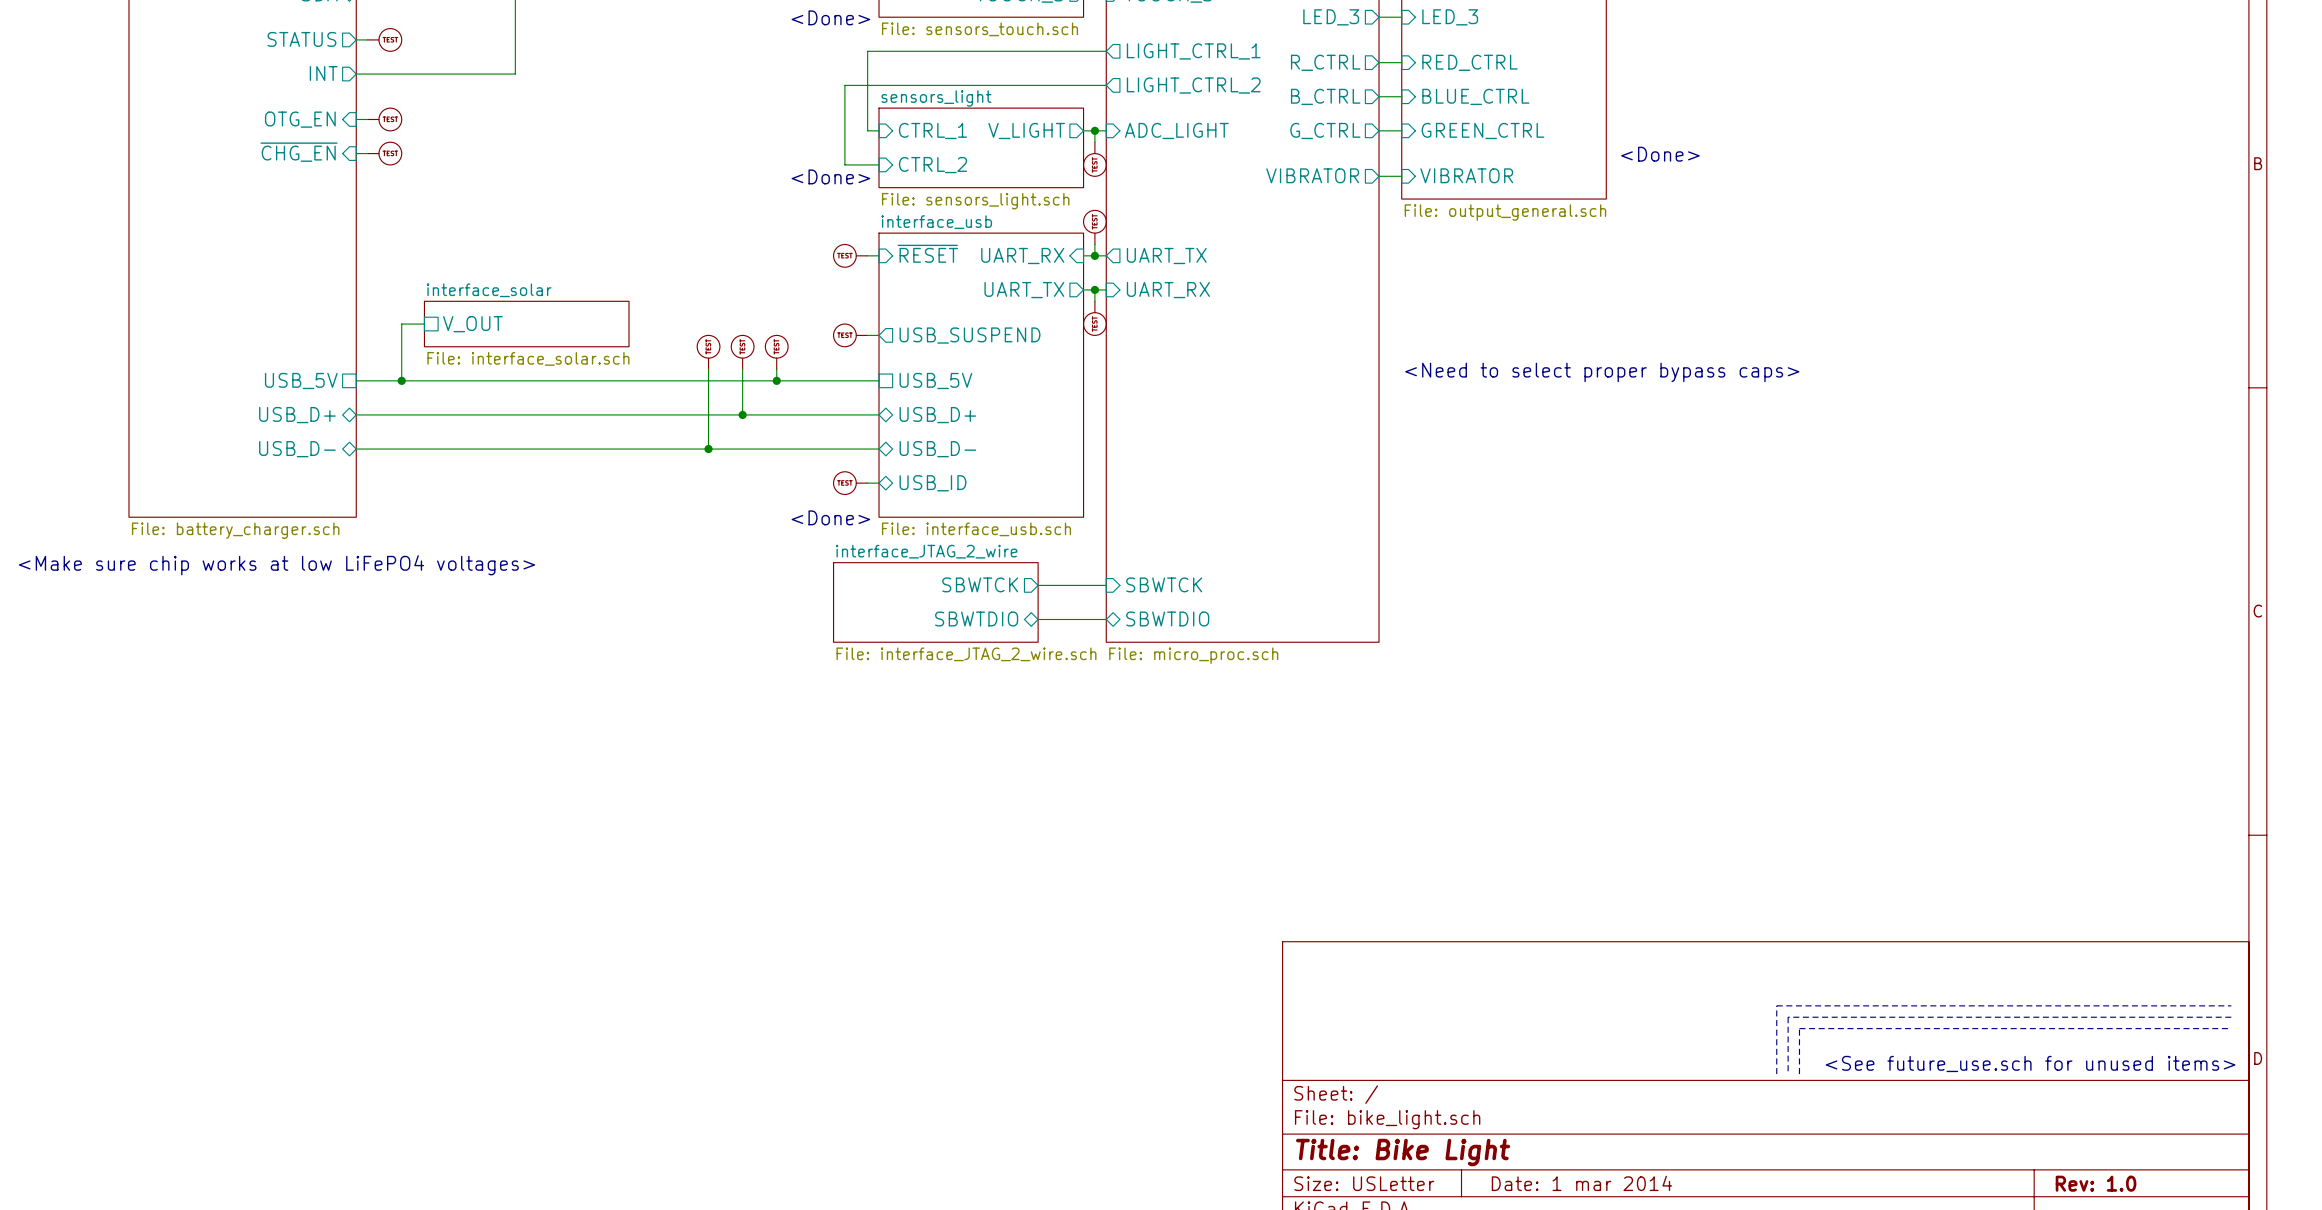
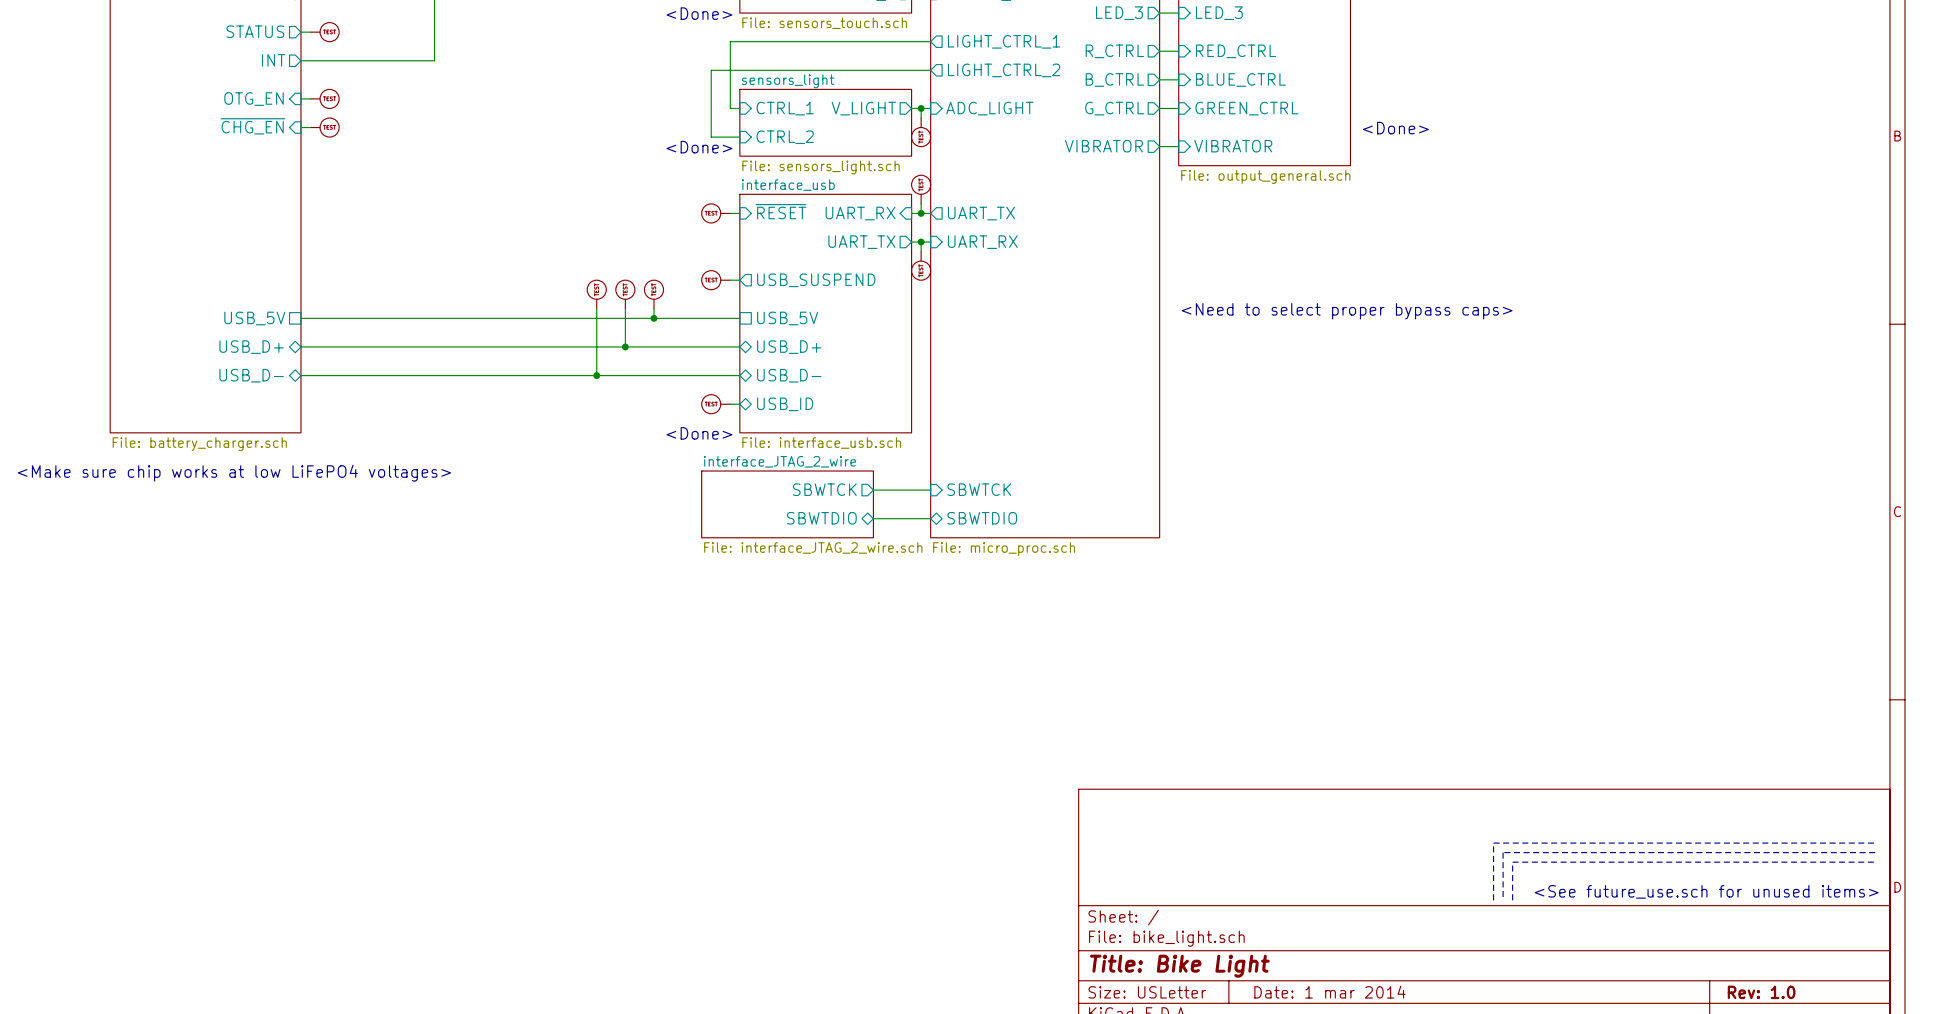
wire: (424, 324) (401, 324) (401, 380) -> none
sheet pin: V_OUT (472, 324) -> none
sheet interface_solar: File: interface_solar.sch (526, 324) -> none
junction: (401, 380) -> none

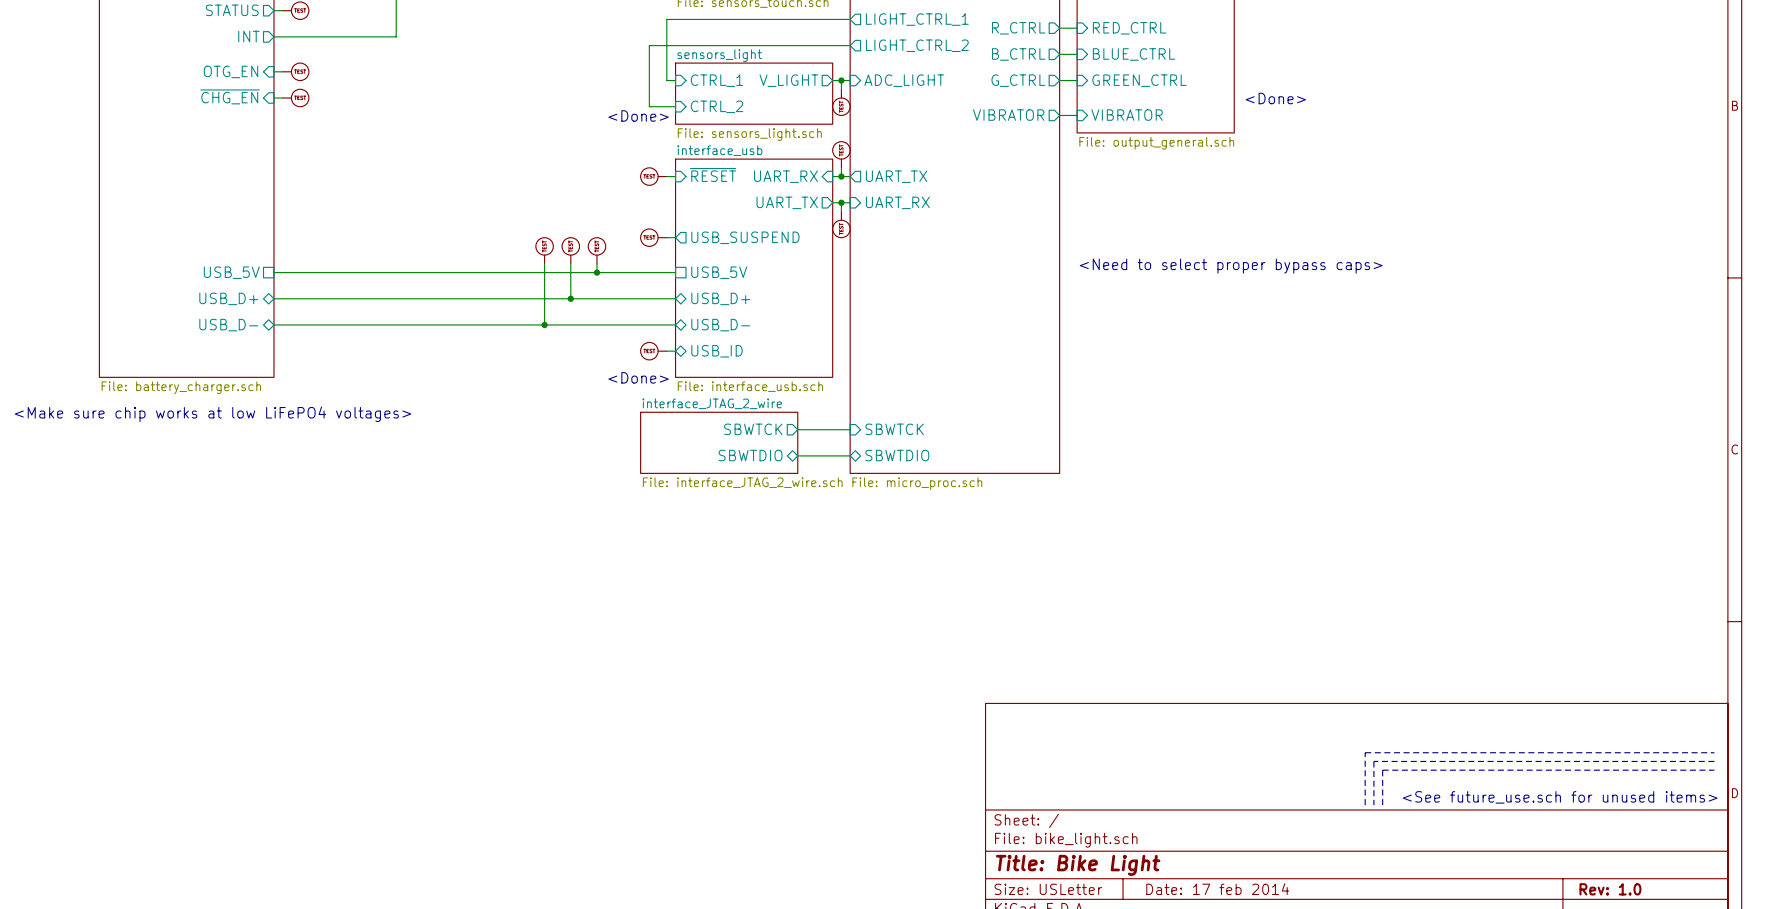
title block: Date: 1 mar 2014 (1329, 992) -> Date: 17 feb 2014 (1217, 889)

